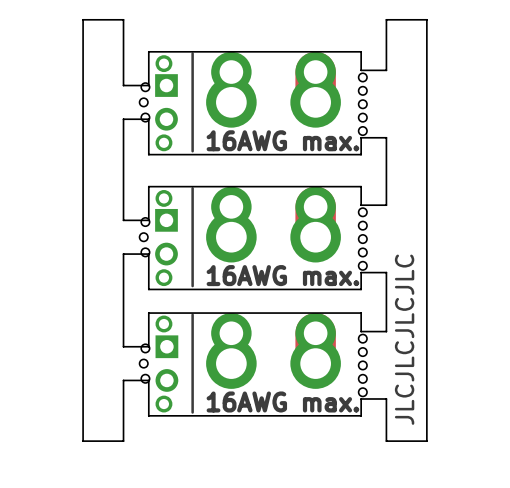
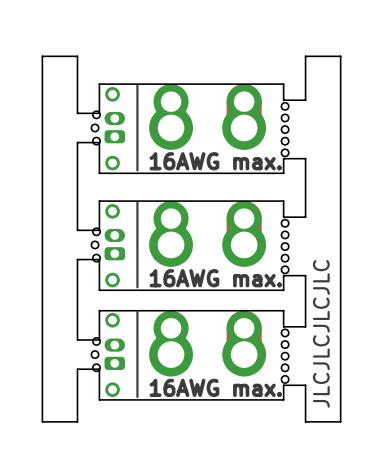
part footprint: [155, 74, 178, 131] -> [104, 111, 126, 144]
part footprint: [155, 208, 178, 266] -> [104, 228, 126, 261]
part footprint: [155, 335, 179, 392] -> [104, 338, 126, 370]

